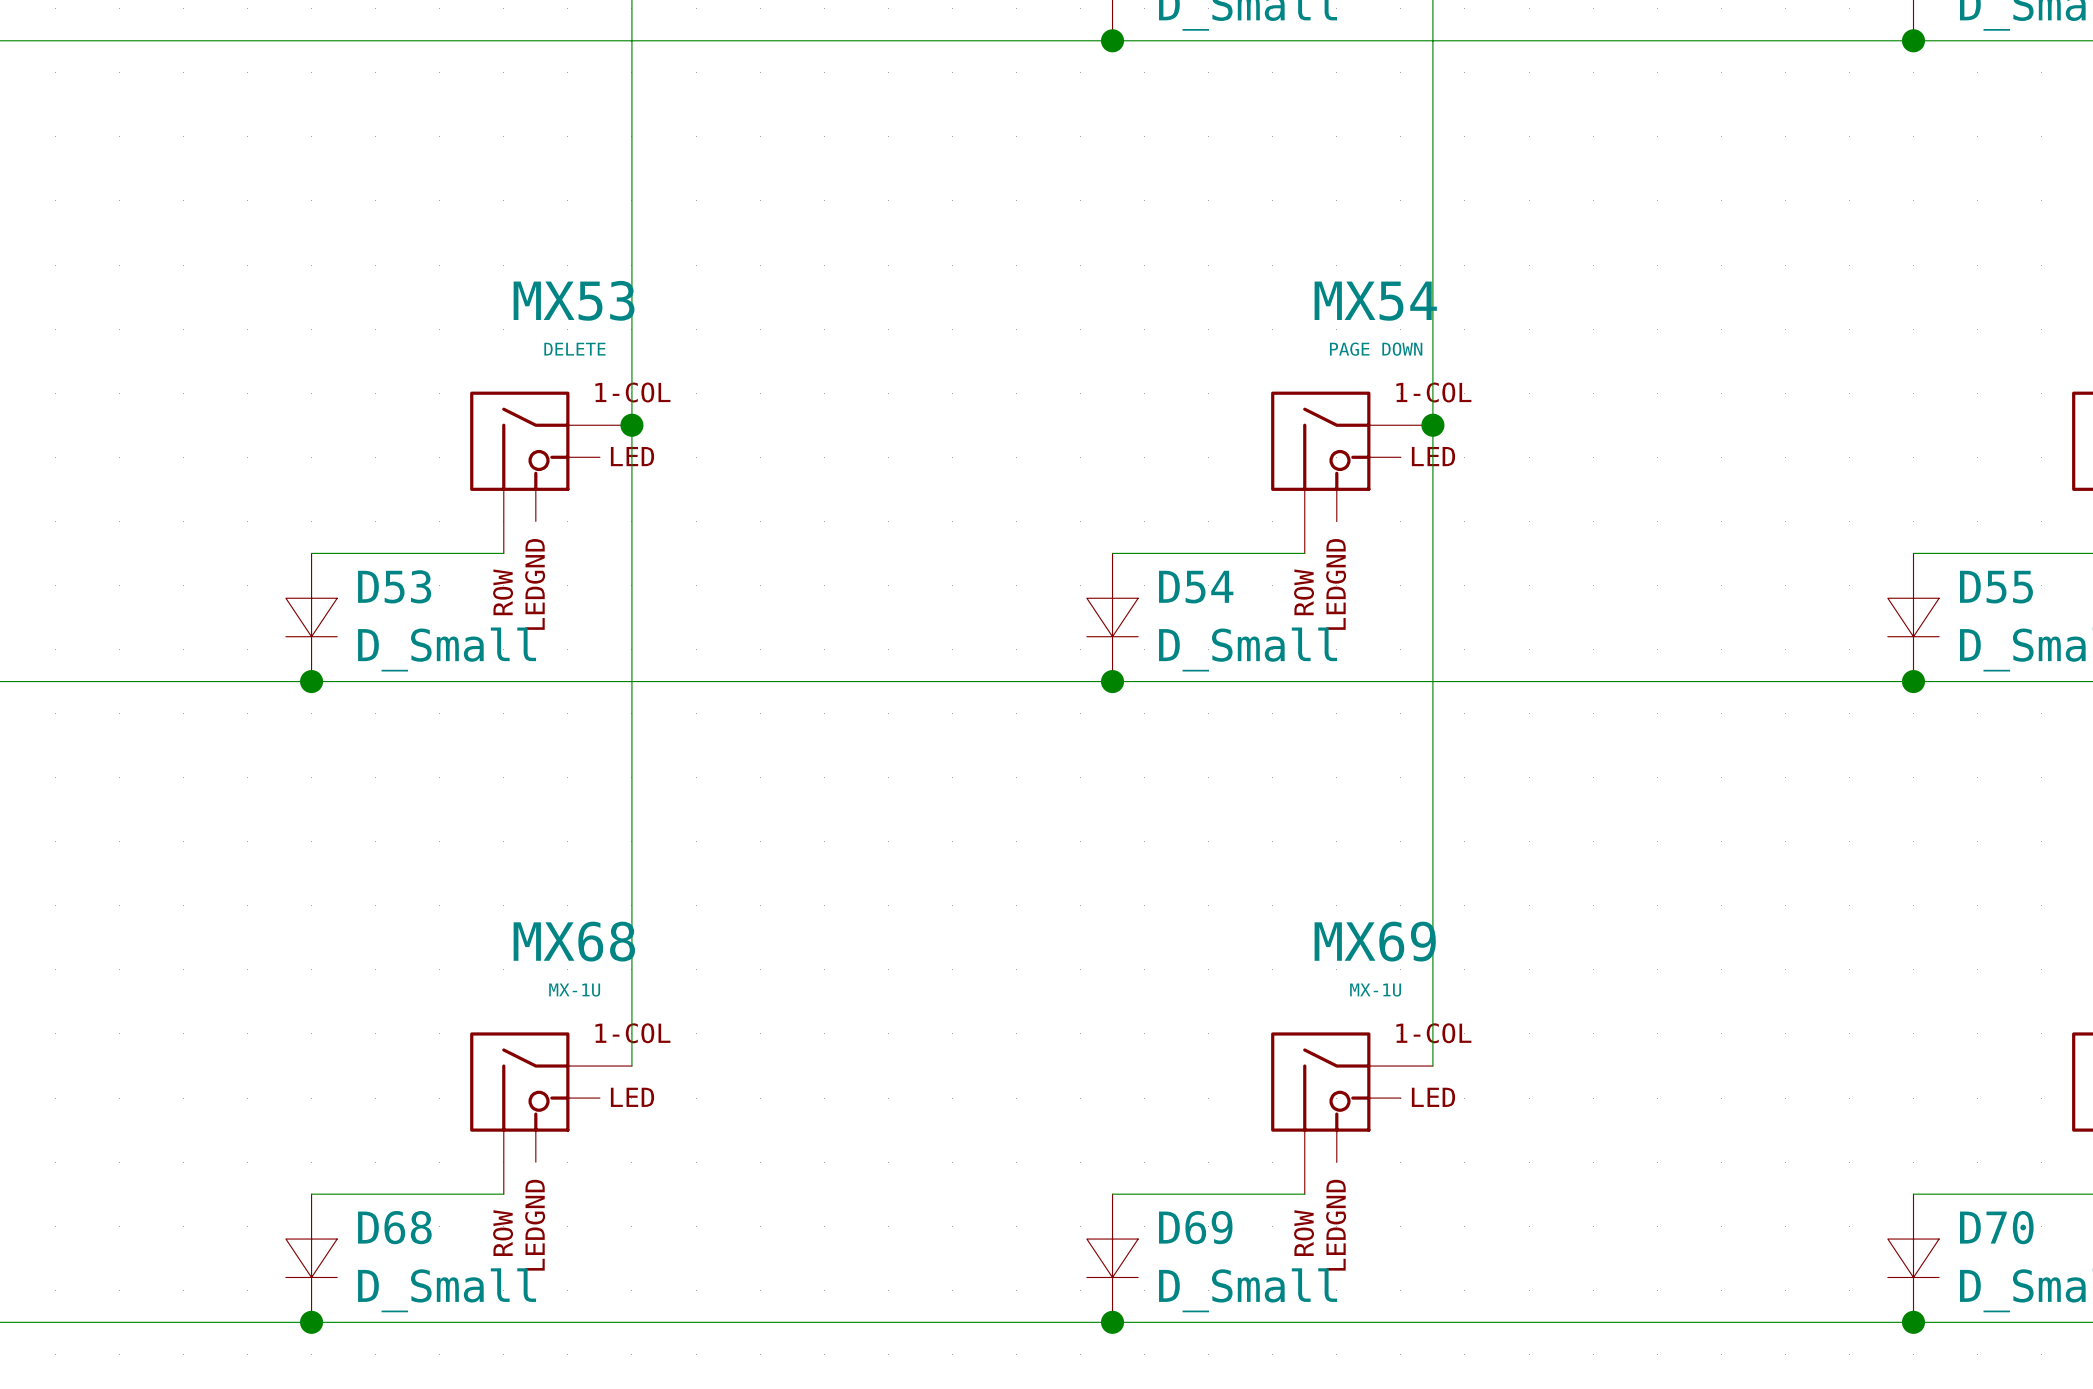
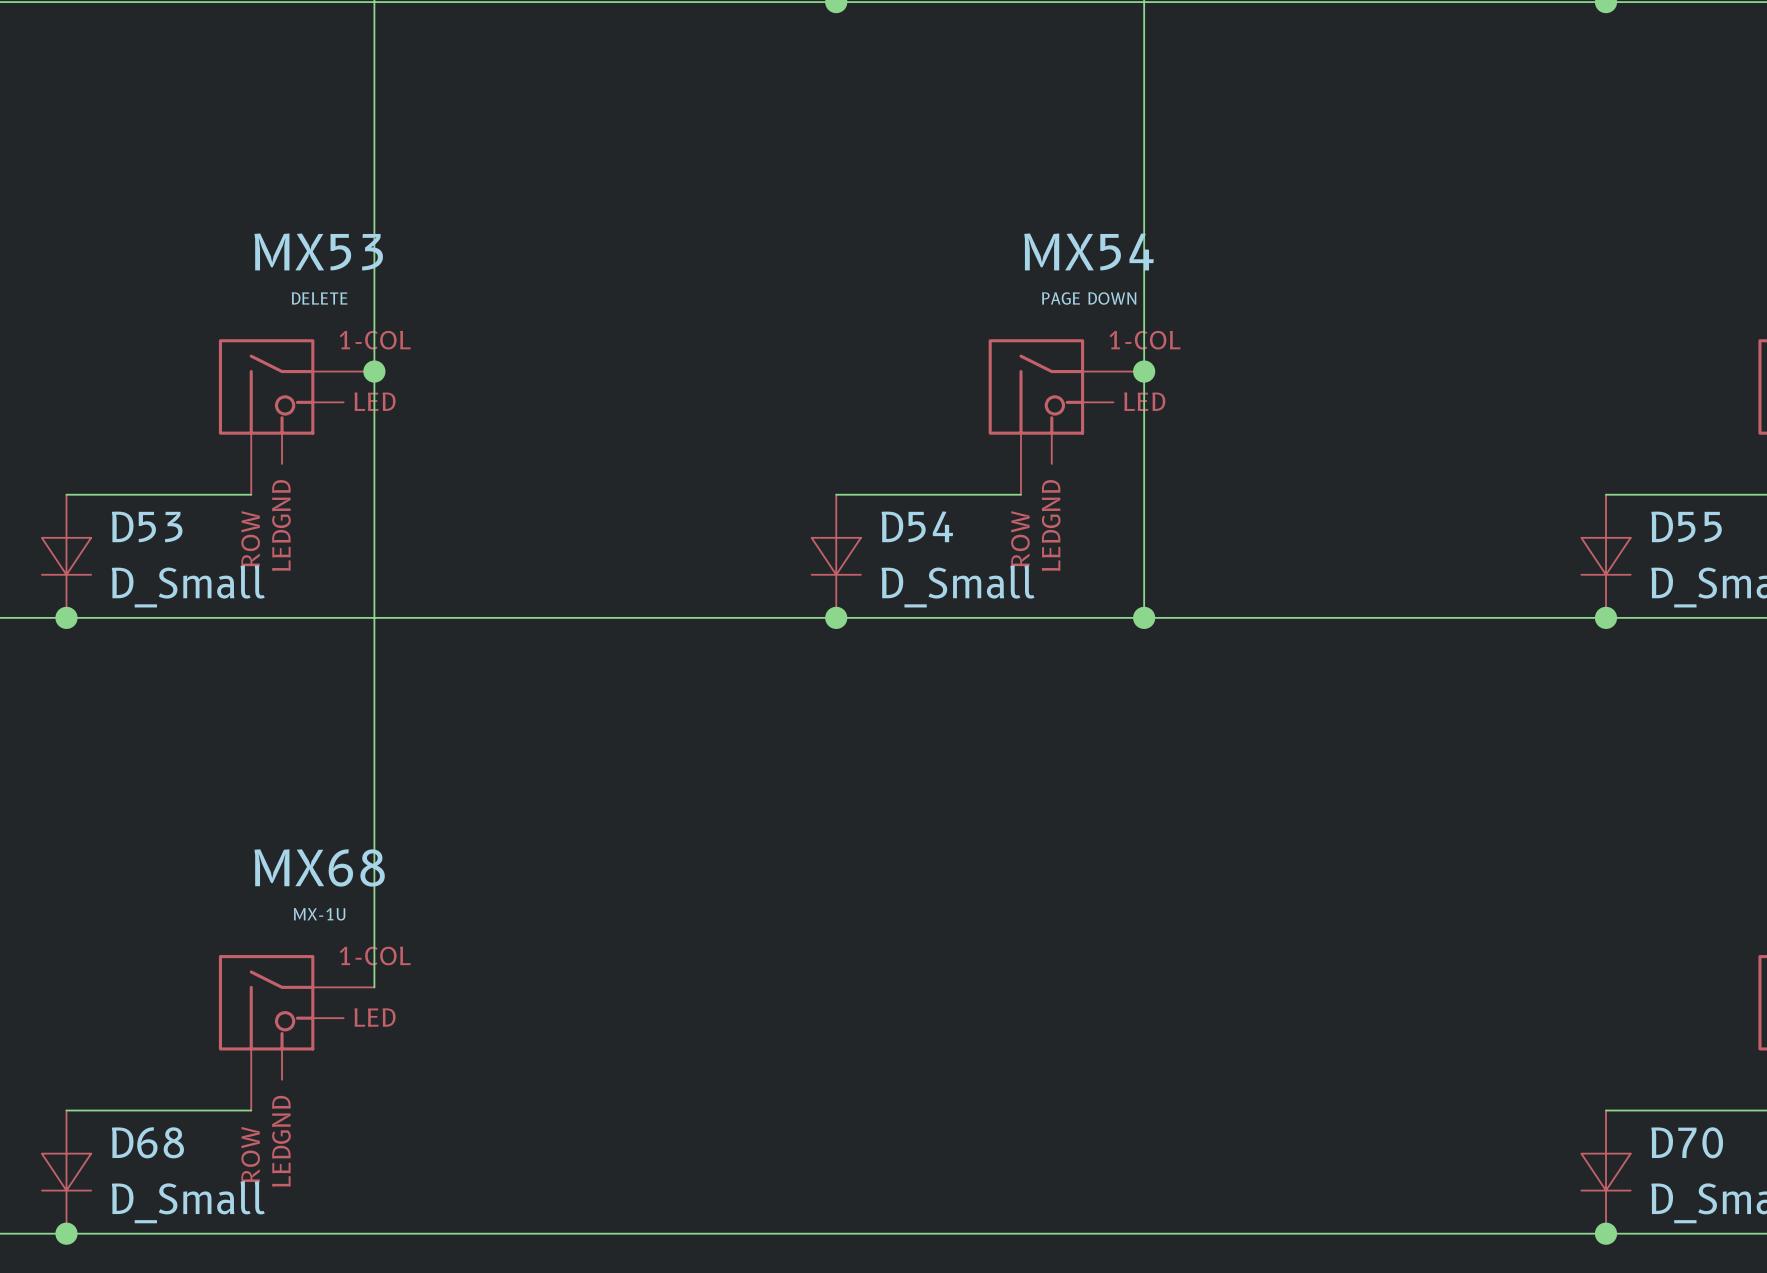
wire: (1432, 681) (1432, 1066) -> none
junction: none -> (1144, 617)
MX69: MX-1U (1352, 1113) -> none
wire: (1112, 1194) (1304, 1194) -> none
D69: D_Small (1112, 1258) -> none
junction: (1112, 1322) -> none

